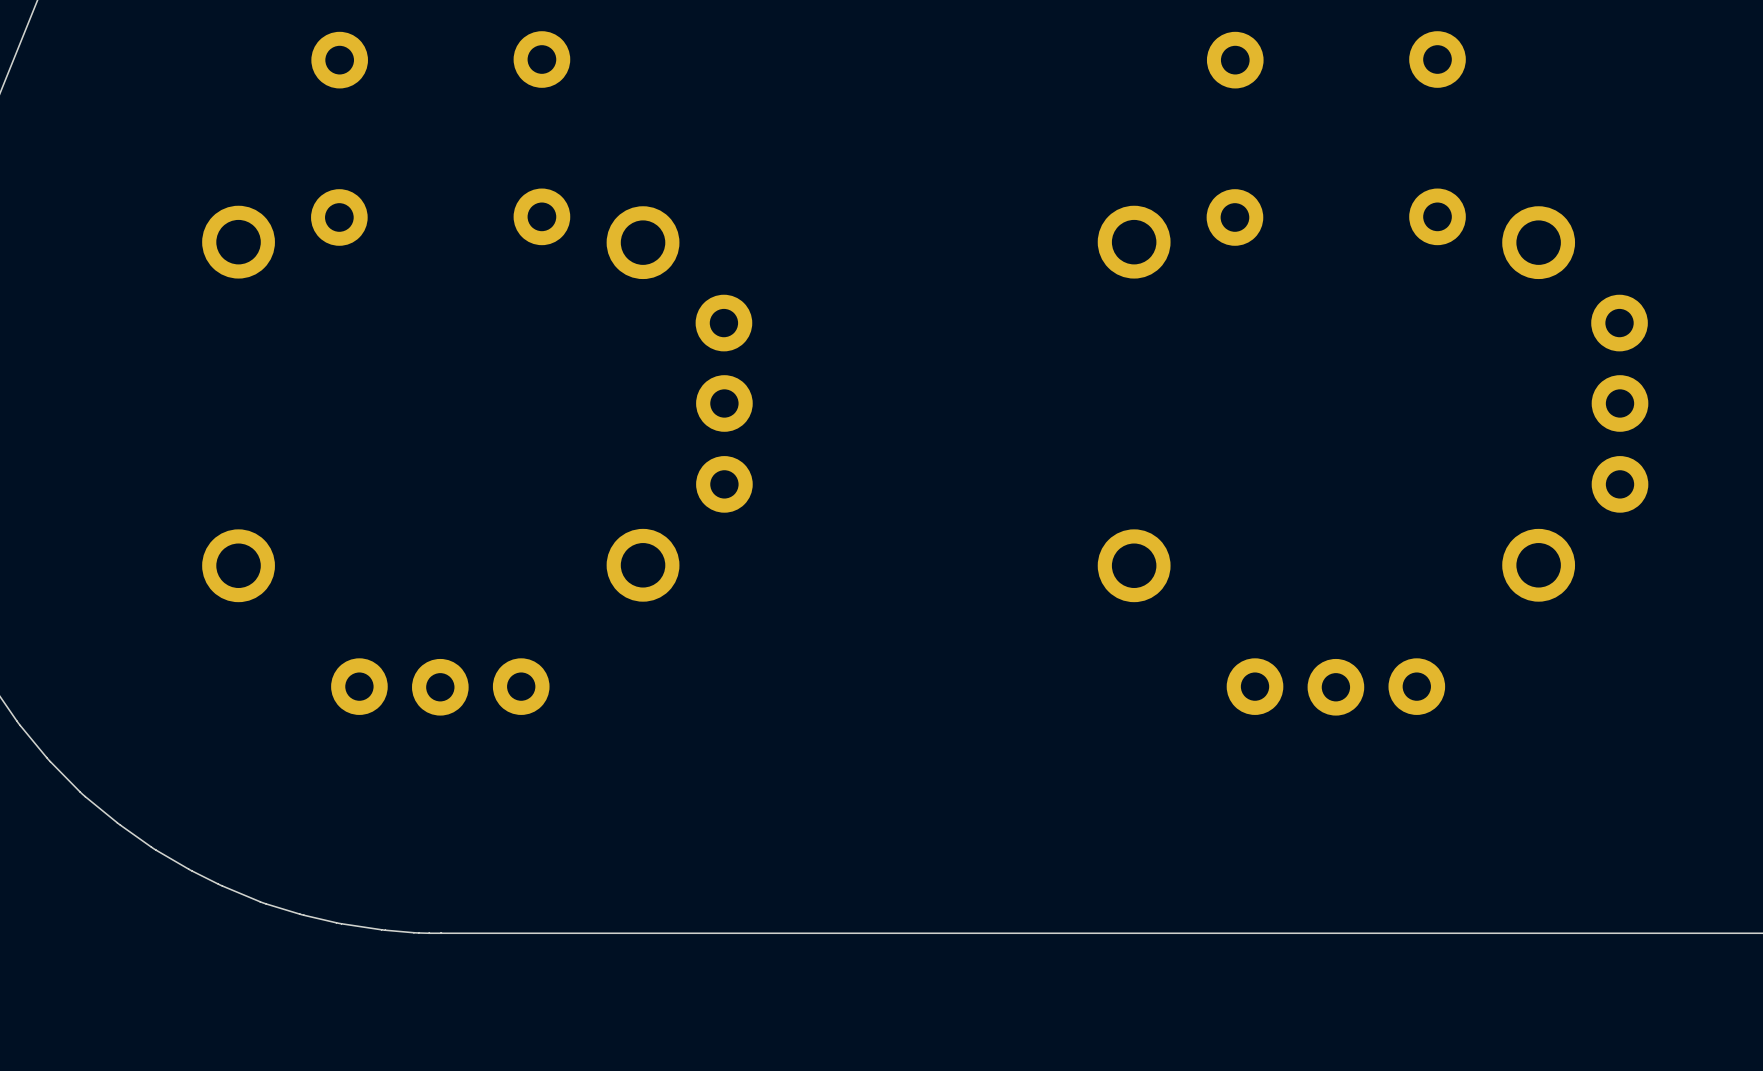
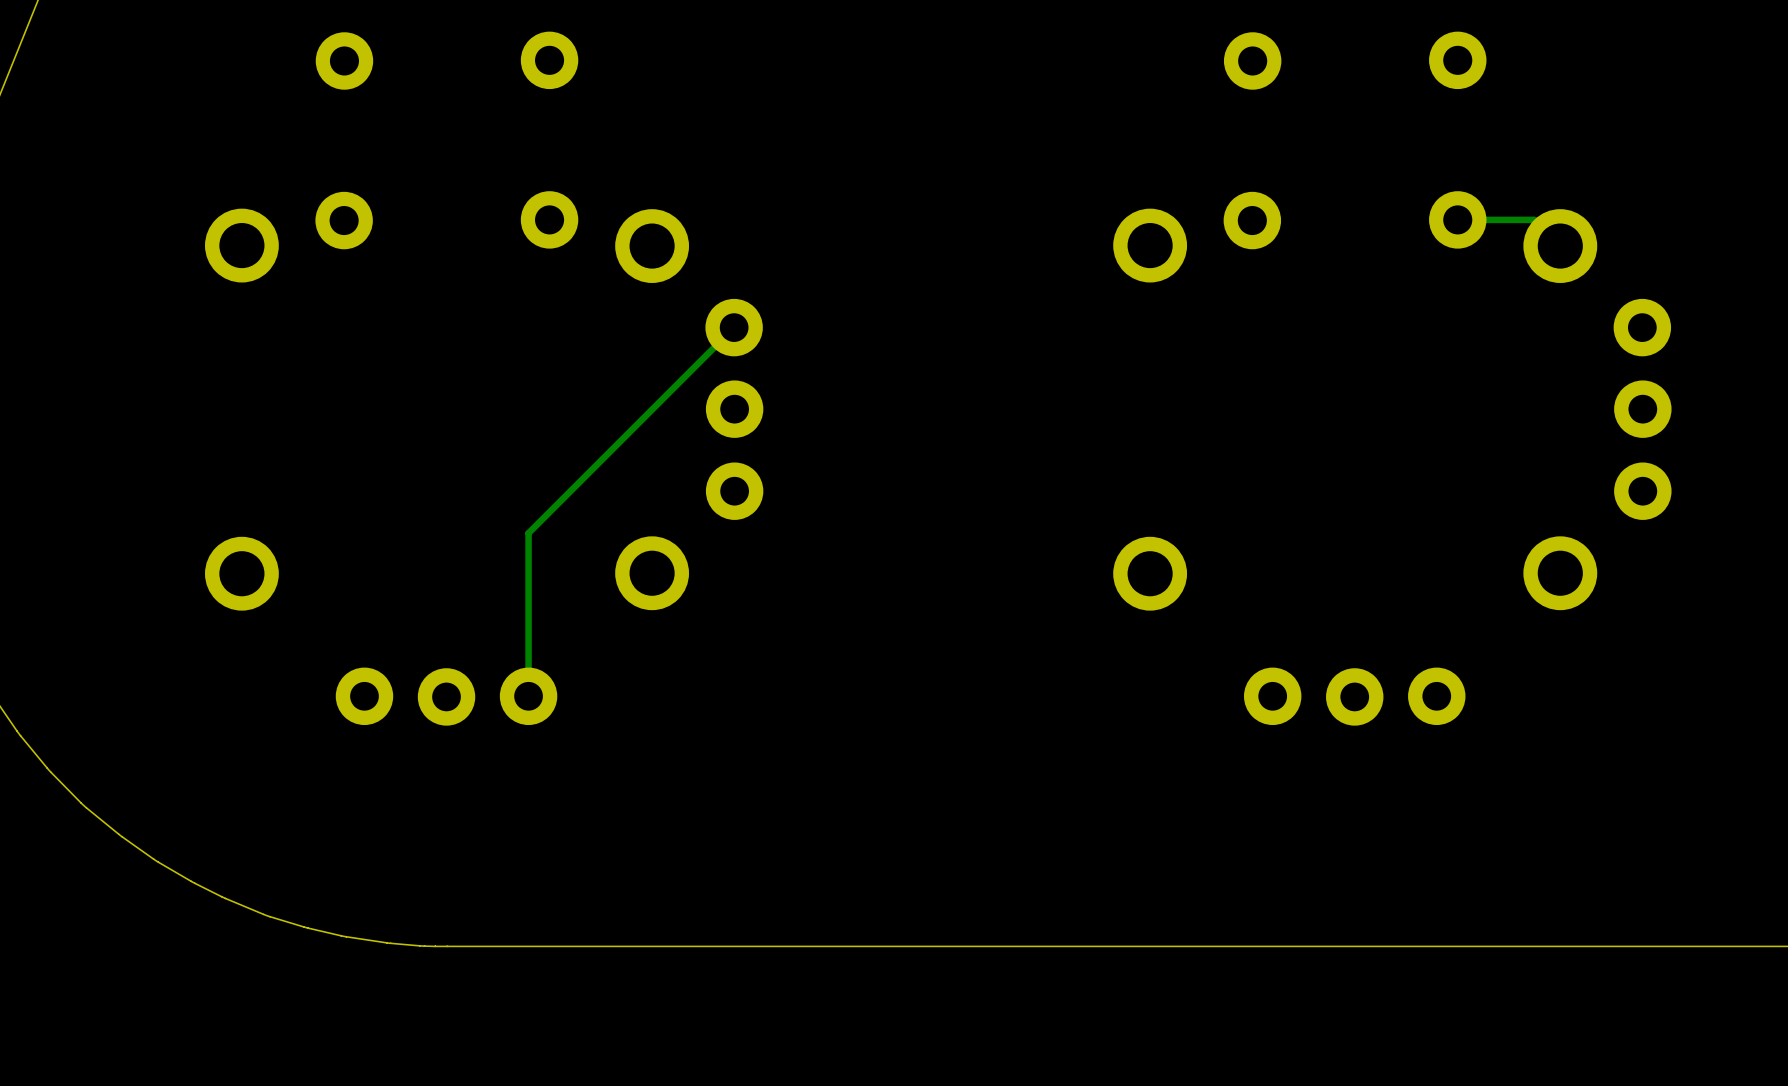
track: none -> (1457, 219) (1534, 219) (1560, 246)
track: none -> (734, 327) (528, 533) (528, 696)

